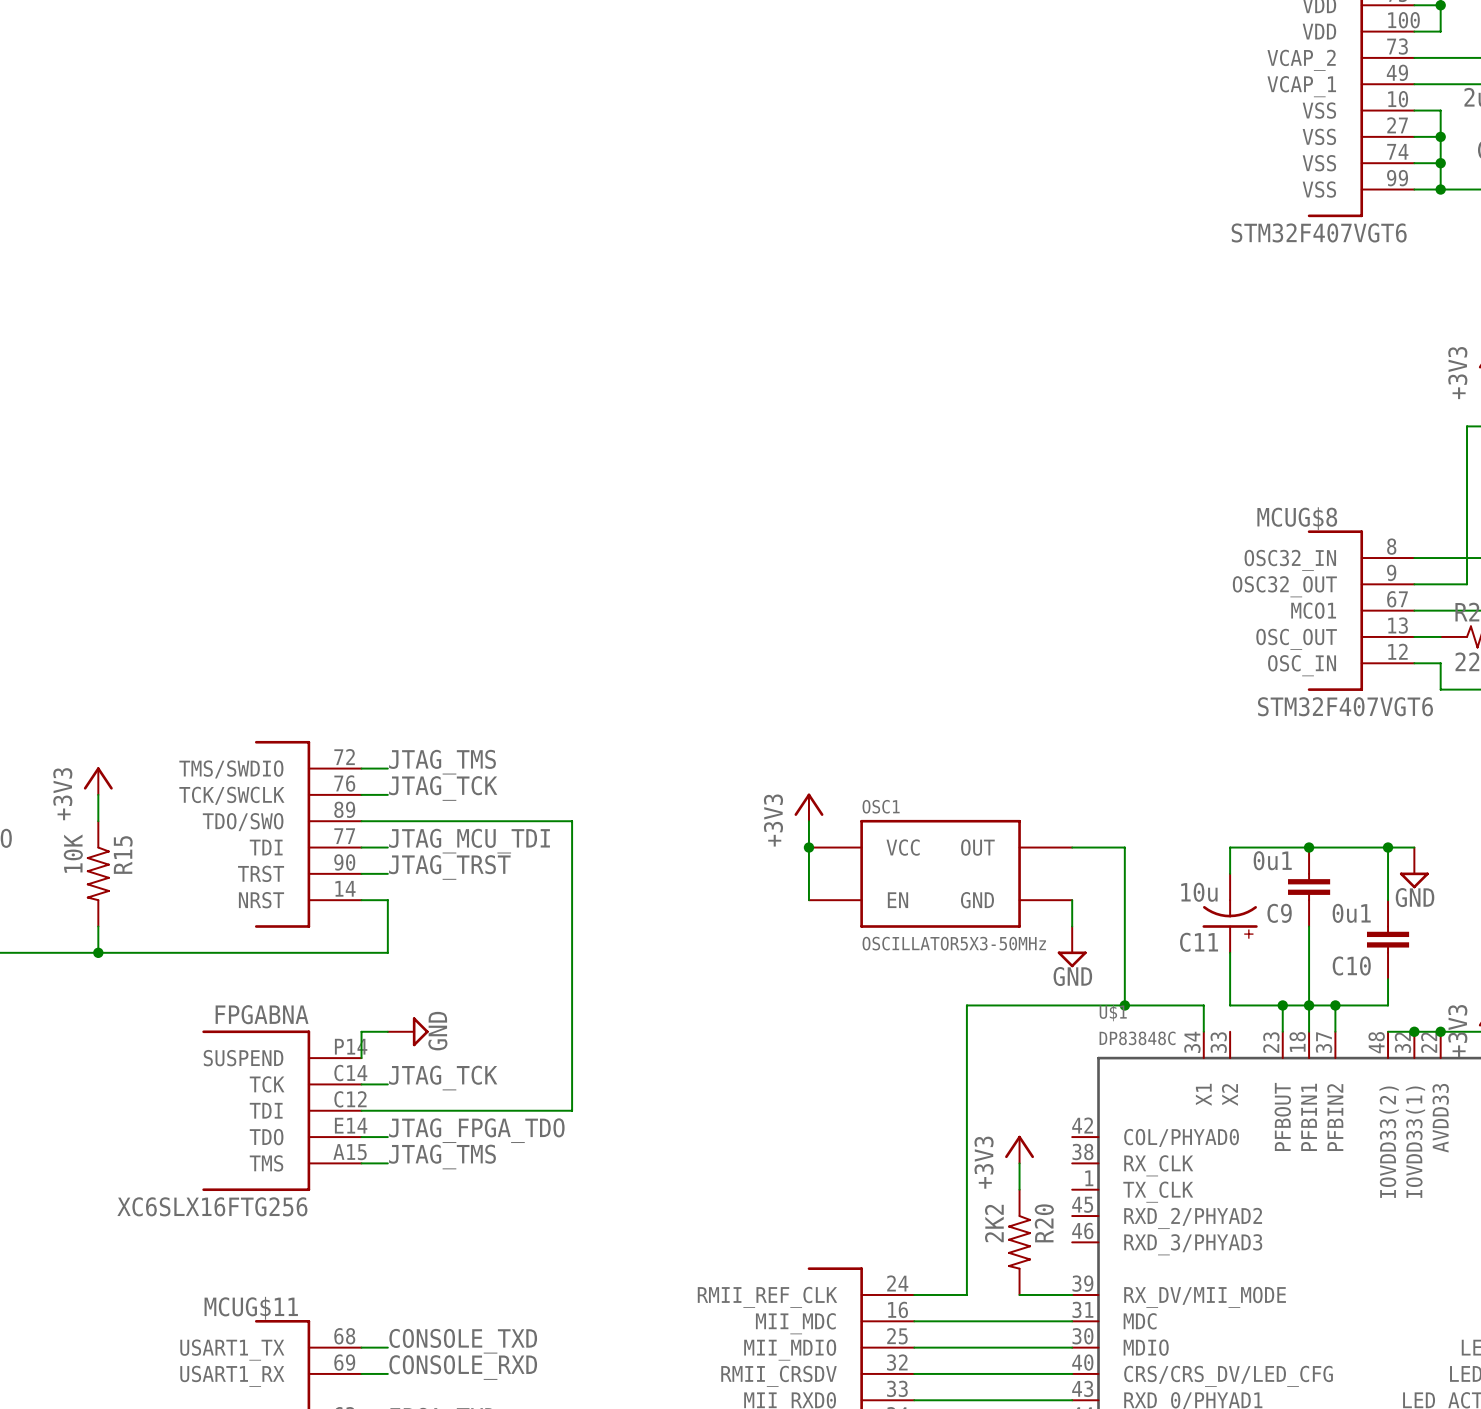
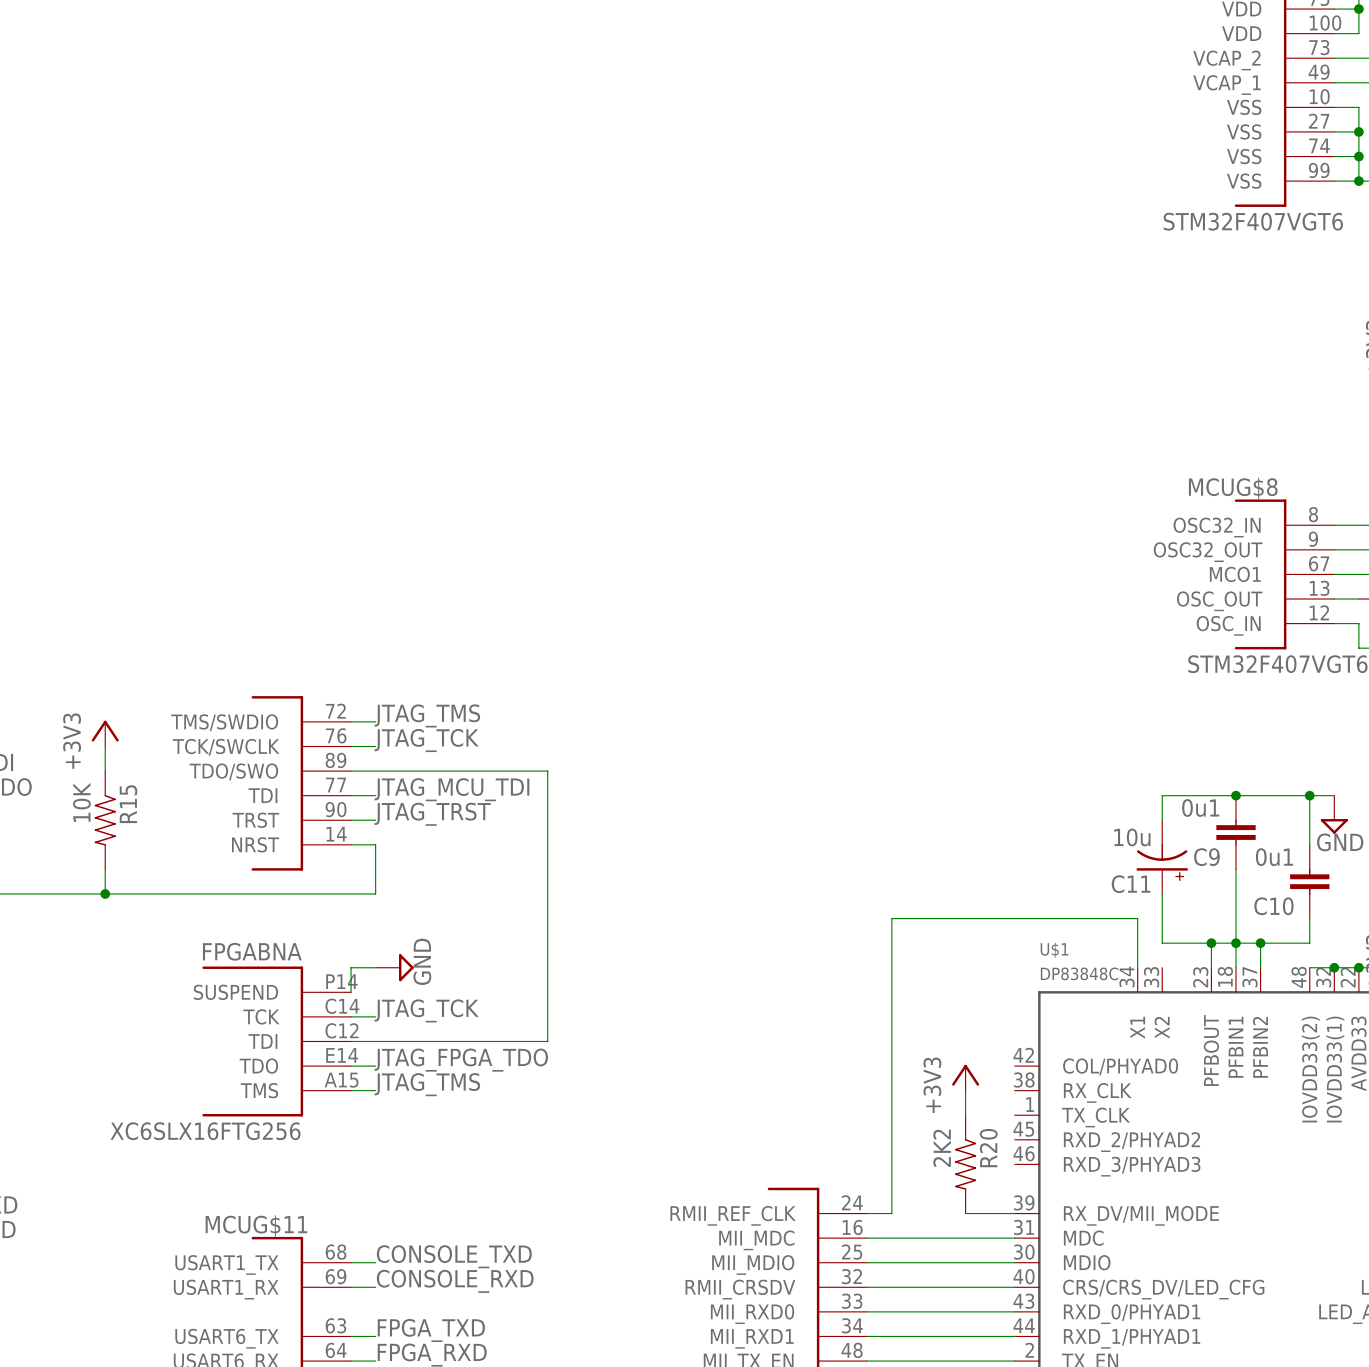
power symbol: +3V3 (808, 807) -> none
wire: (808, 821) (808, 900) -> none
junction: (808, 847) -> none
wire: (1072, 847) (1124, 847) (1124, 1005) -> none
OSC1: OSCILLATOR5X3-50MHz (940, 873) -> none
wire: (1072, 900) (1072, 926) -> none
power symbol: GND (1072, 946) -> none
junction: (1124, 1005) -> none
wire: (1203, 1005) (966, 1005) (966, 1294) (940, 1294) -> (1137, 943) (1137, 918) (891, 918) (891, 1213)

